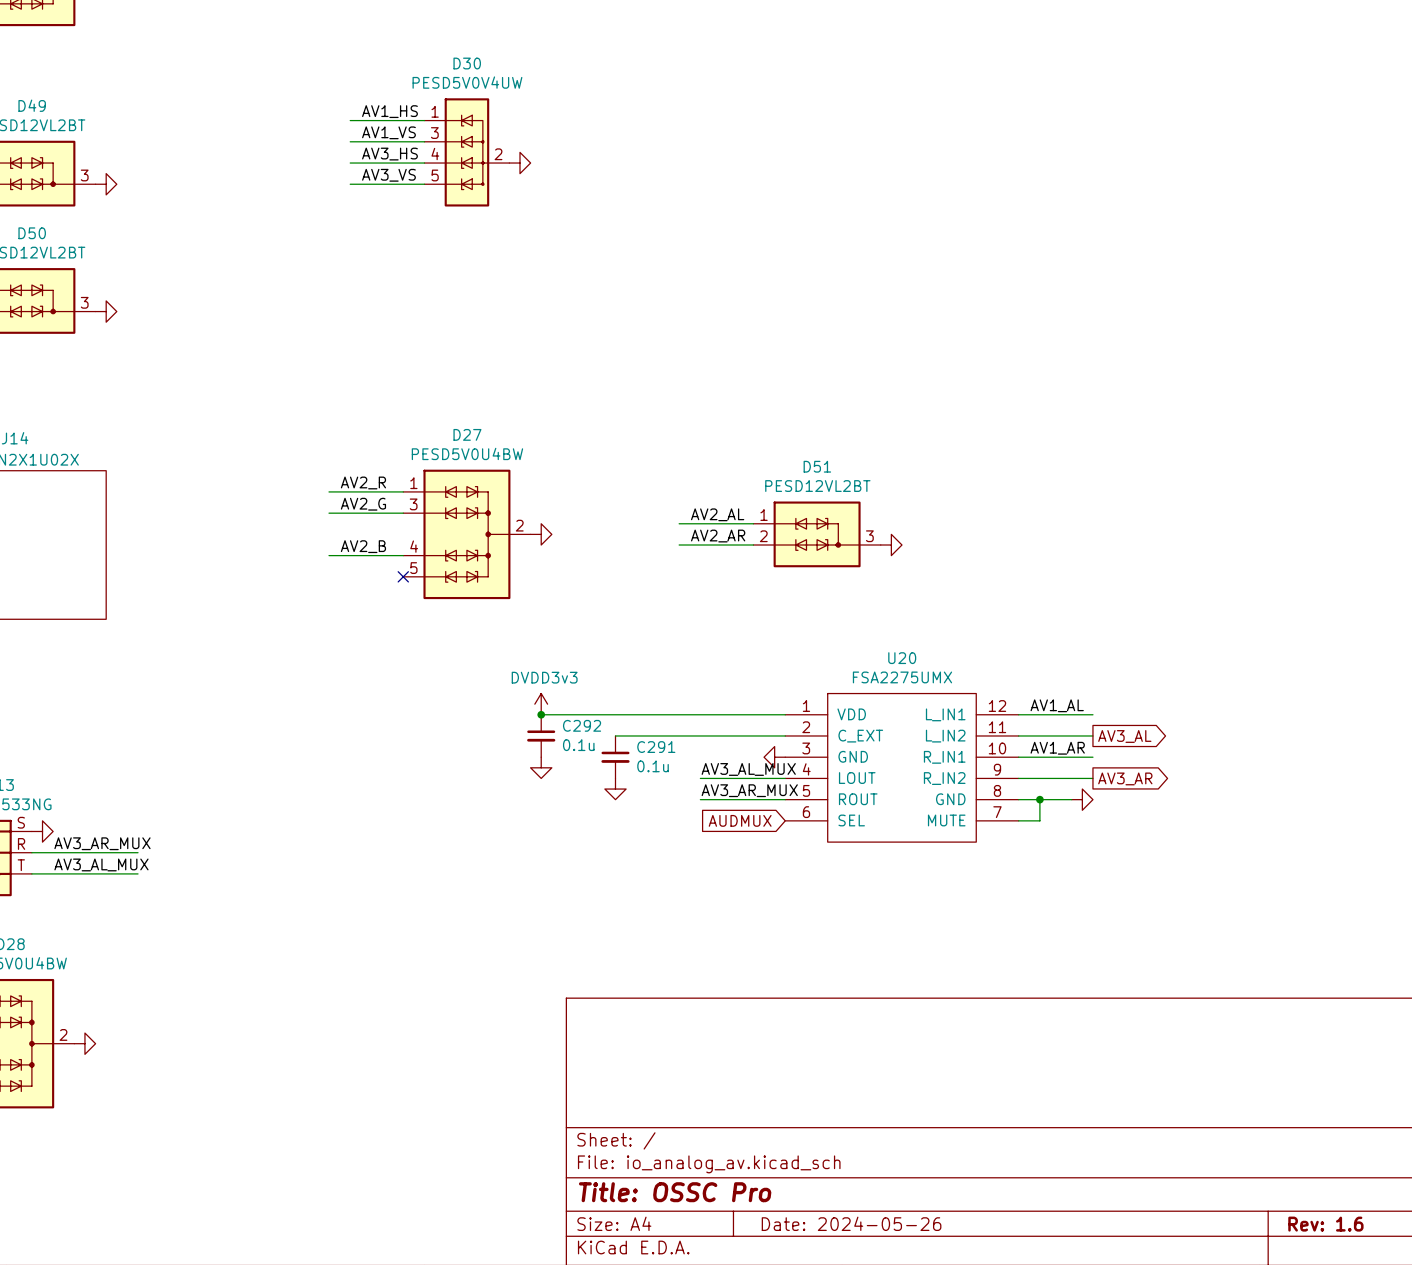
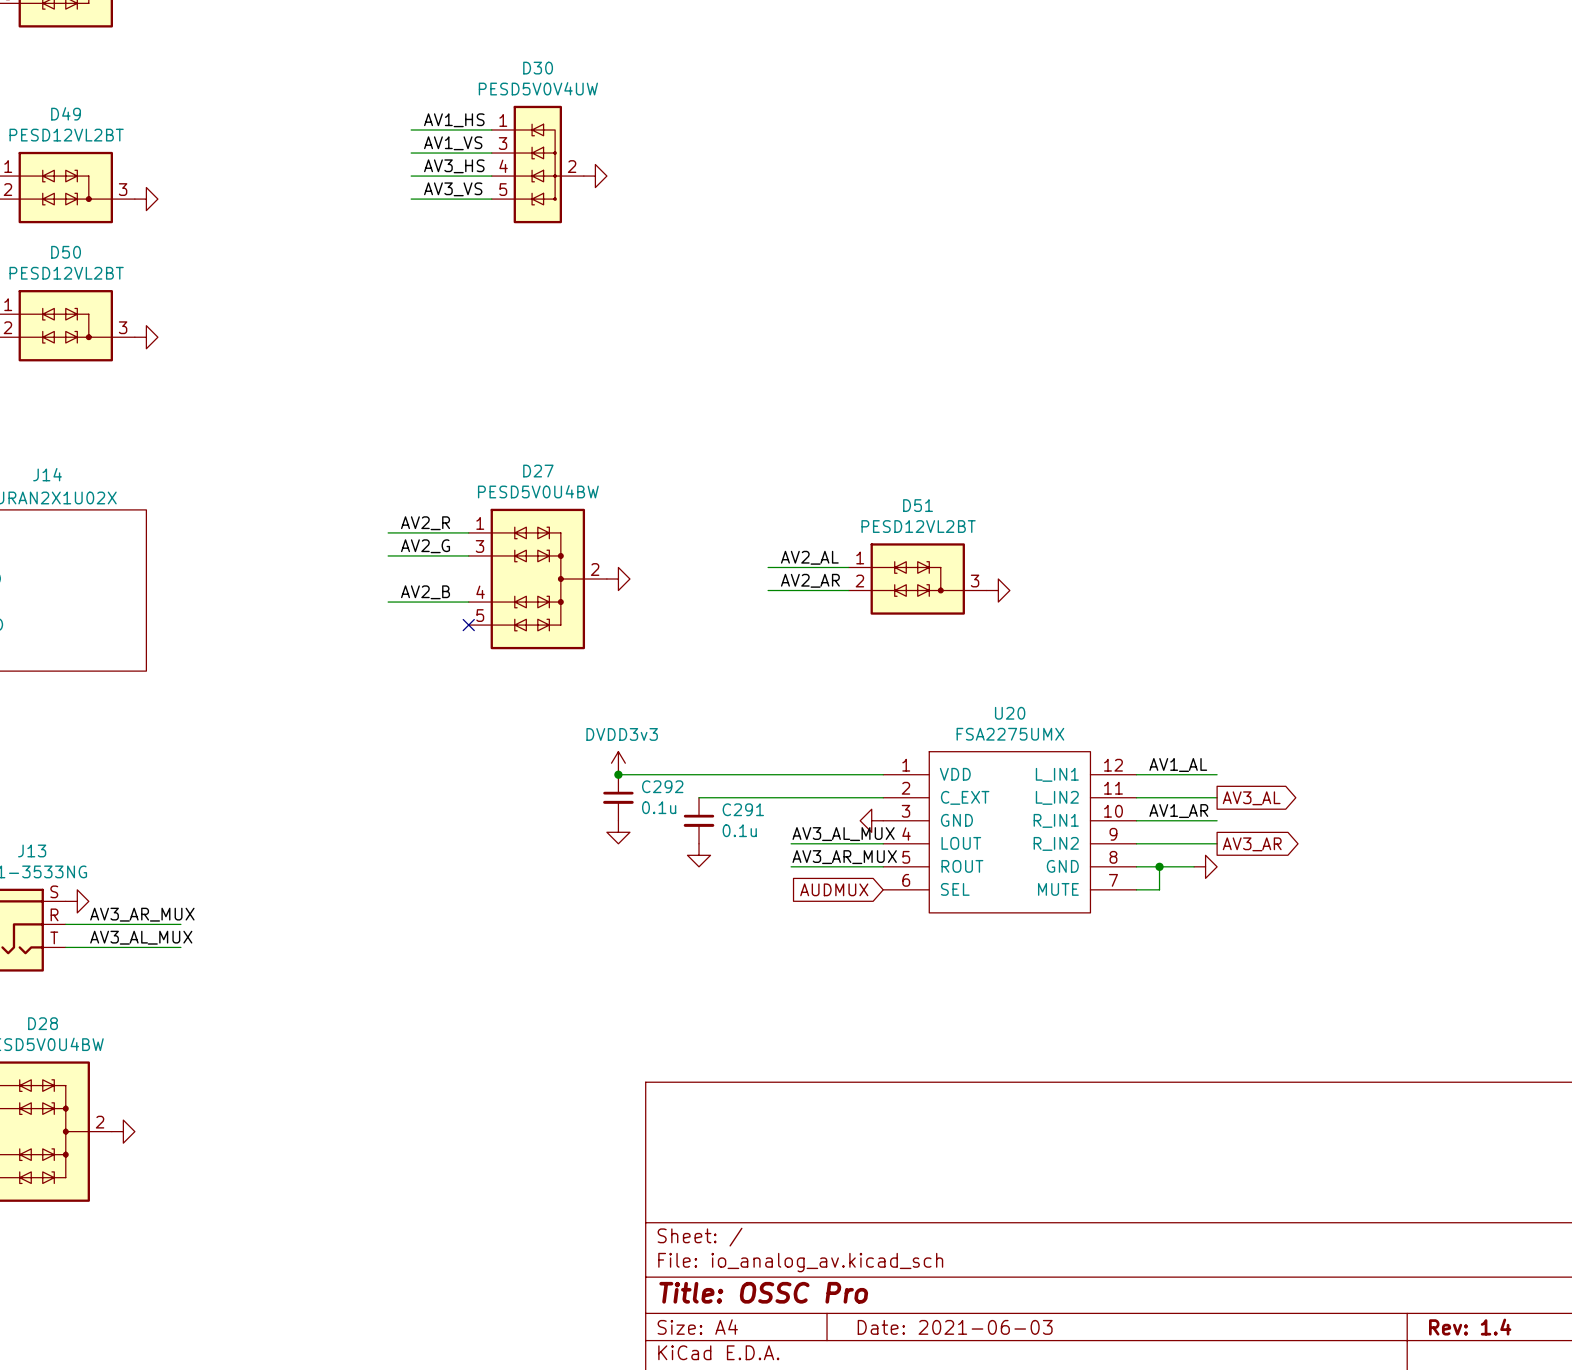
title block: Date: 2024-05-26 (851, 1223) -> Date: 2021-06-03 (955, 1327)
title block: Rev: 1.6 (1325, 1224) -> Rev: 1.4 (1470, 1327)

